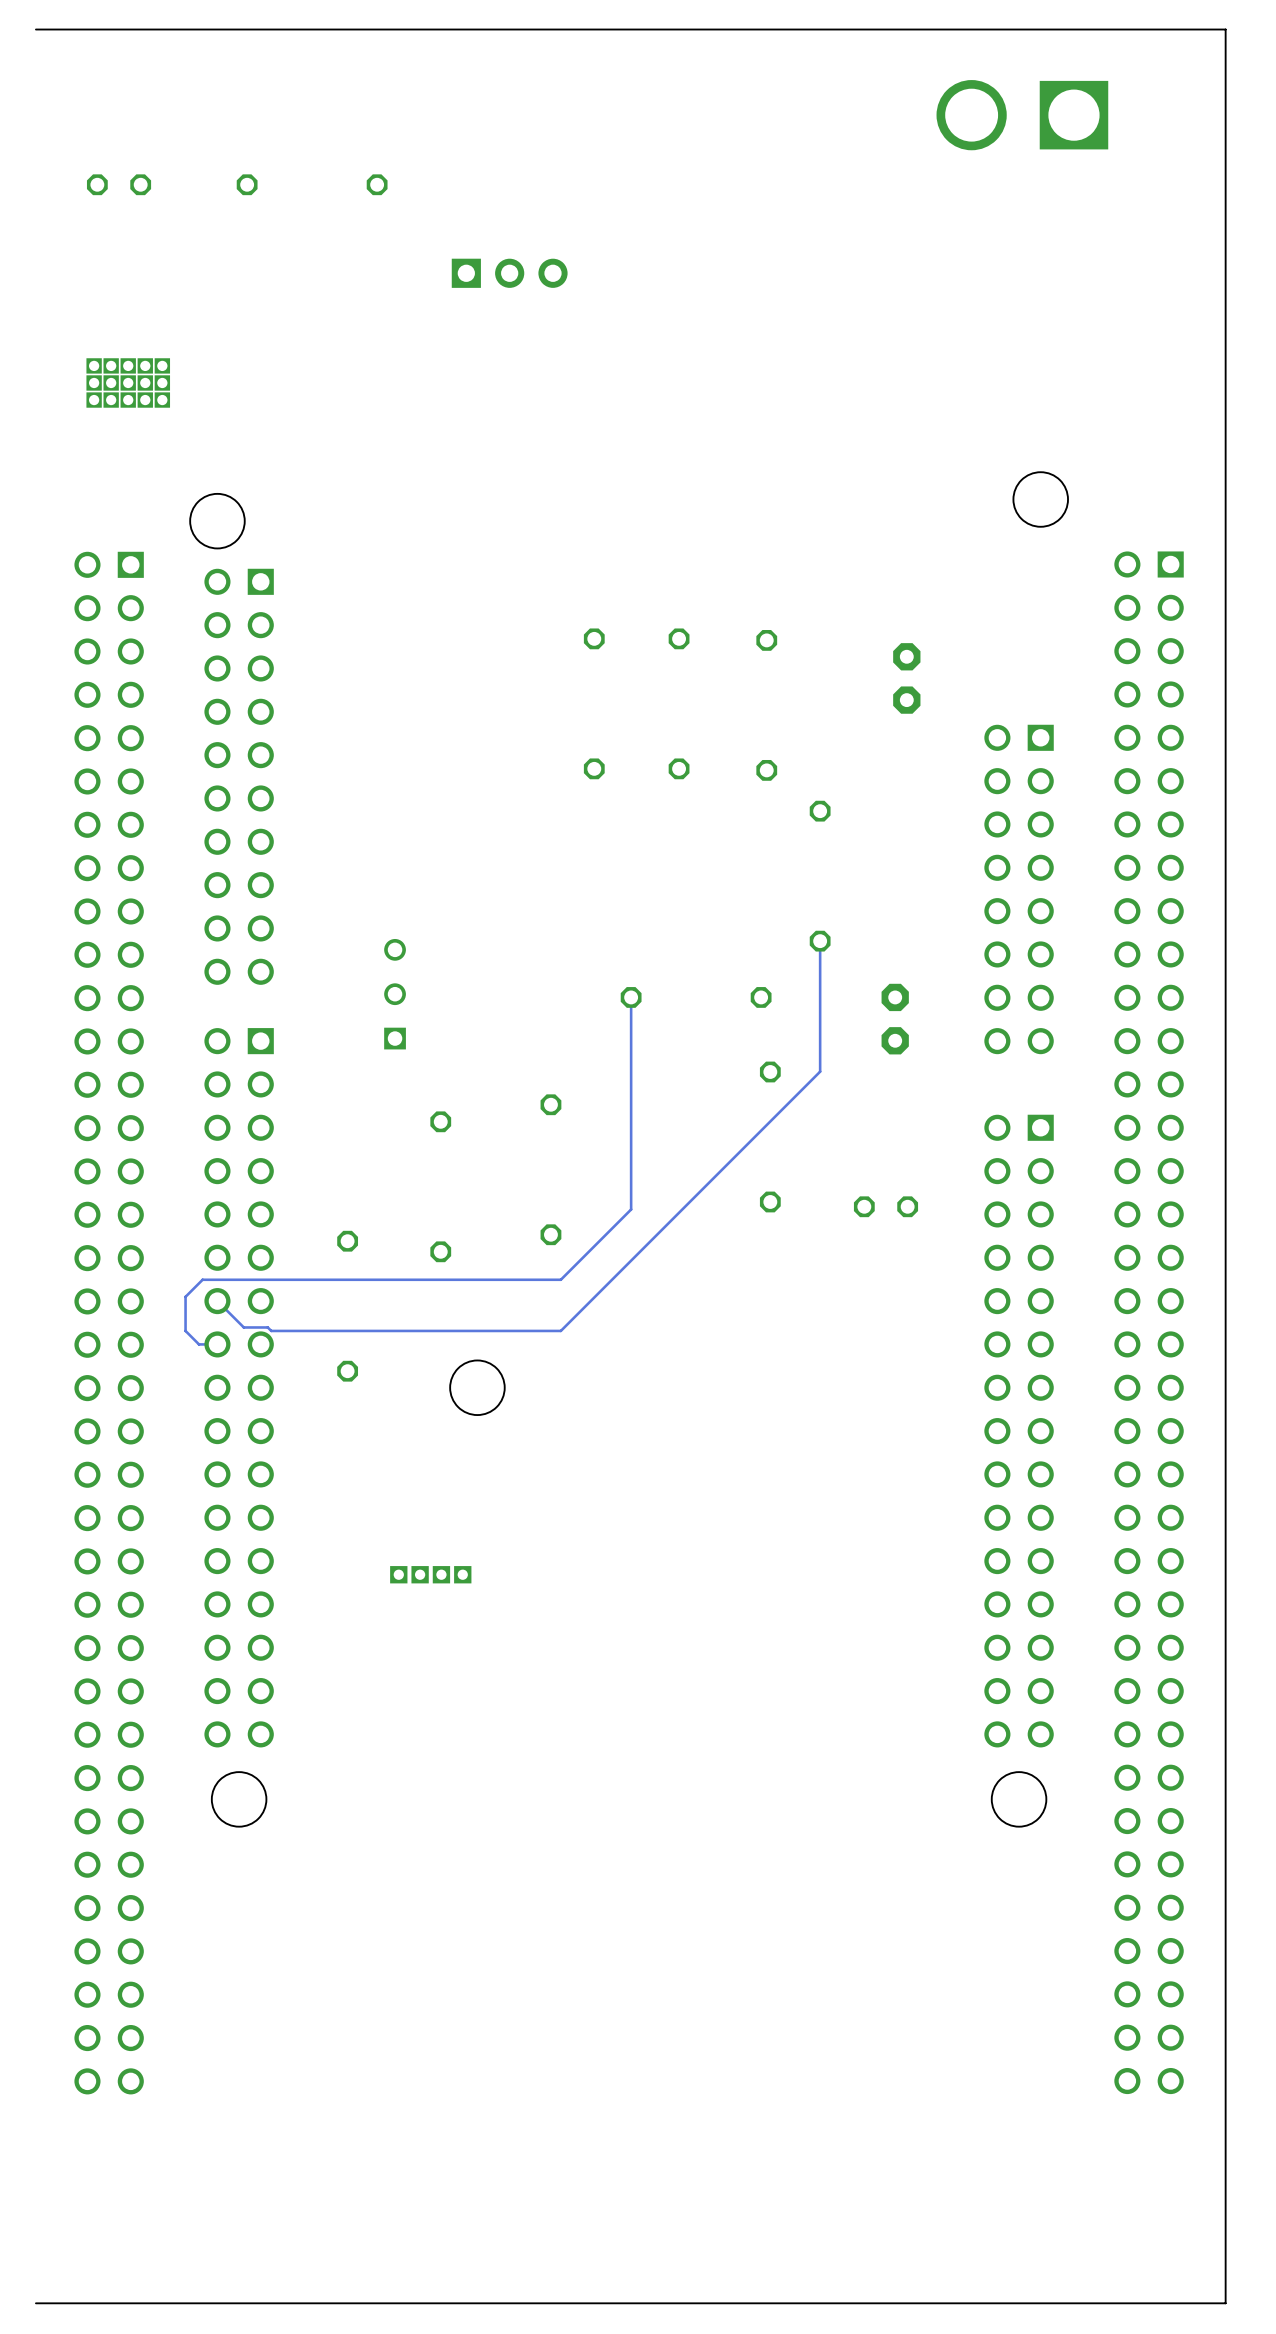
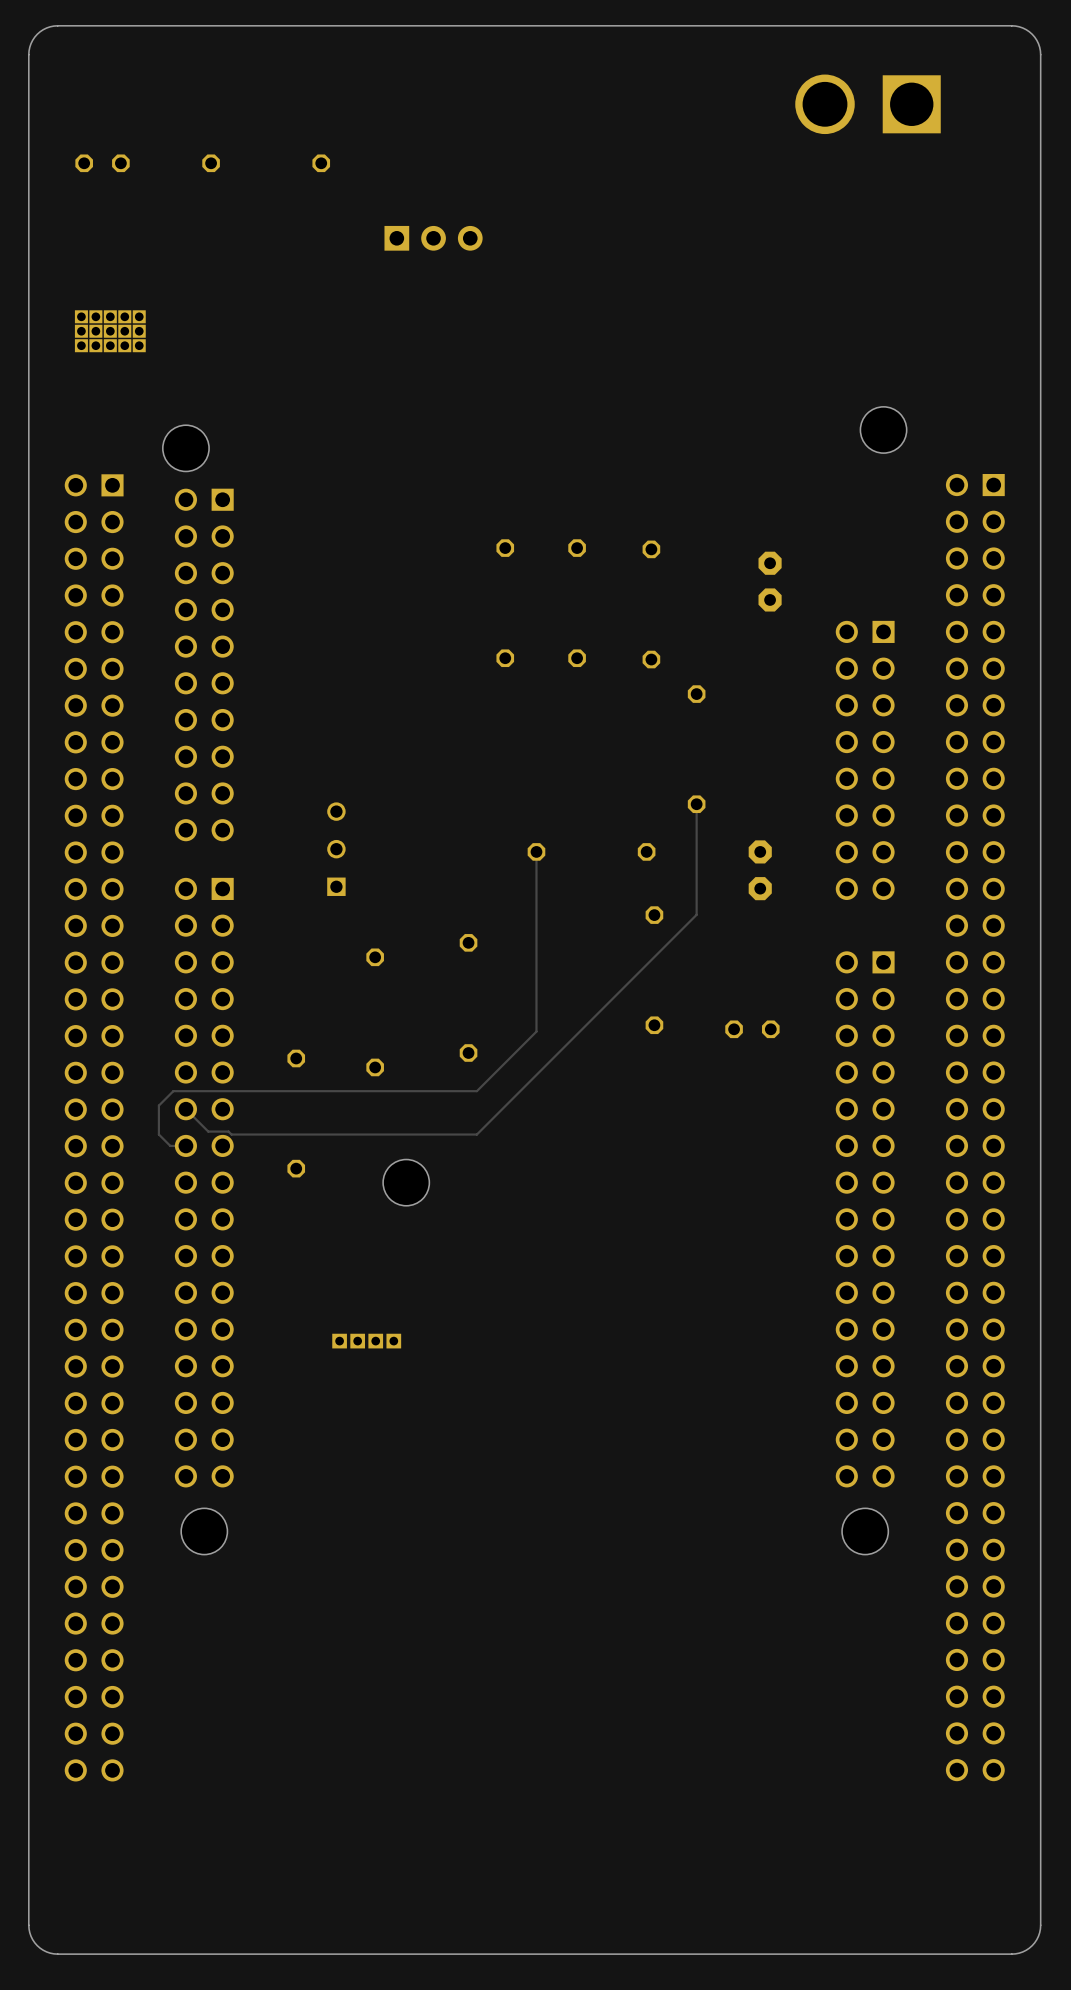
board edge: none -> (1011, 25) (57, 25) (43, 29) (32, 40) (28, 54) (28, 1925) (32, 1939) (43, 1950) (57, 1954) (1011, 1954) (1026, 1950) (1036, 1939) (1040, 1925) (1040, 54) (1038, 43) (1032, 34) (1022, 28) (1011, 25)
board edge: (35, 29) (1225, 29) (1225, 2303) (35, 2303) -> none

